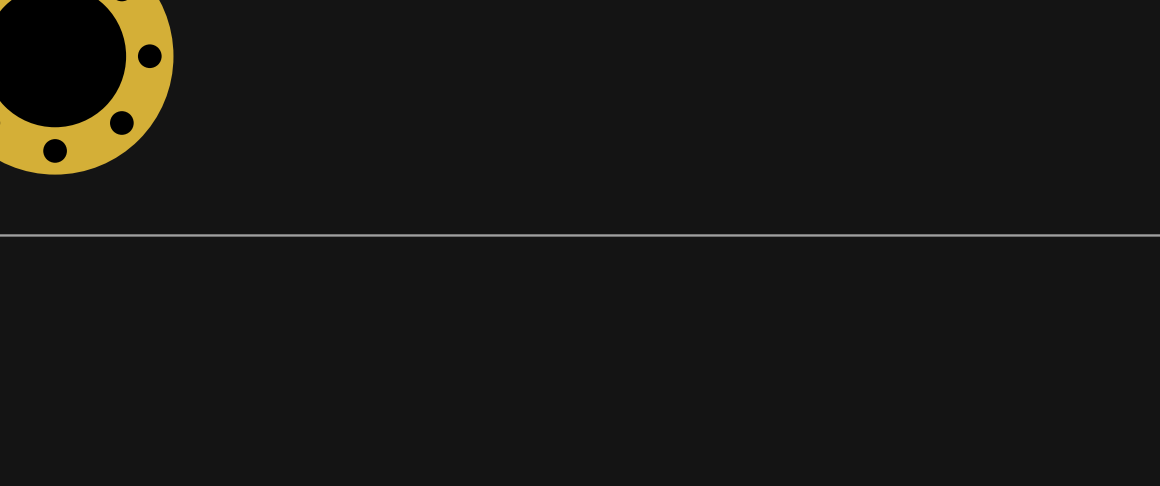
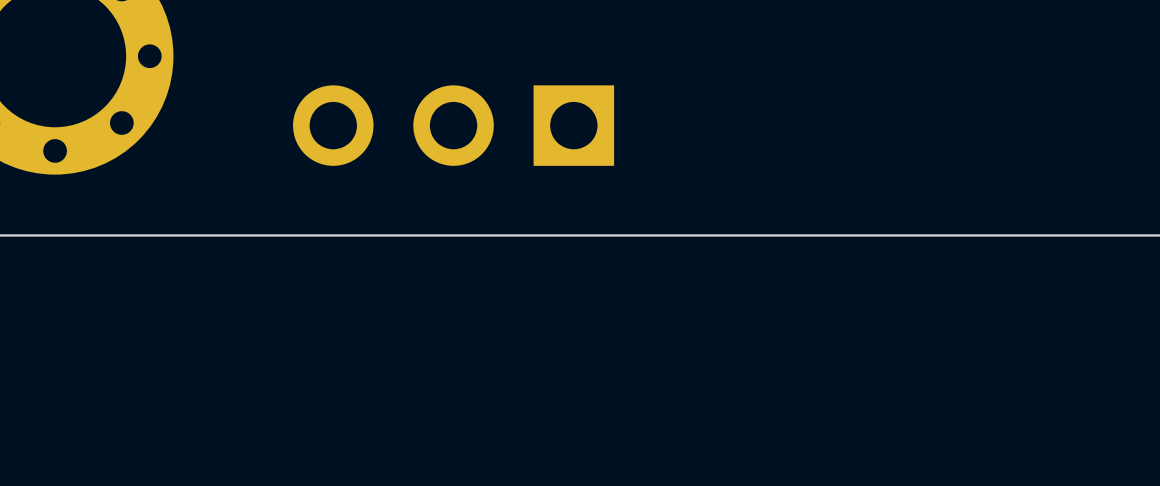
part: none -> (453, 125)

